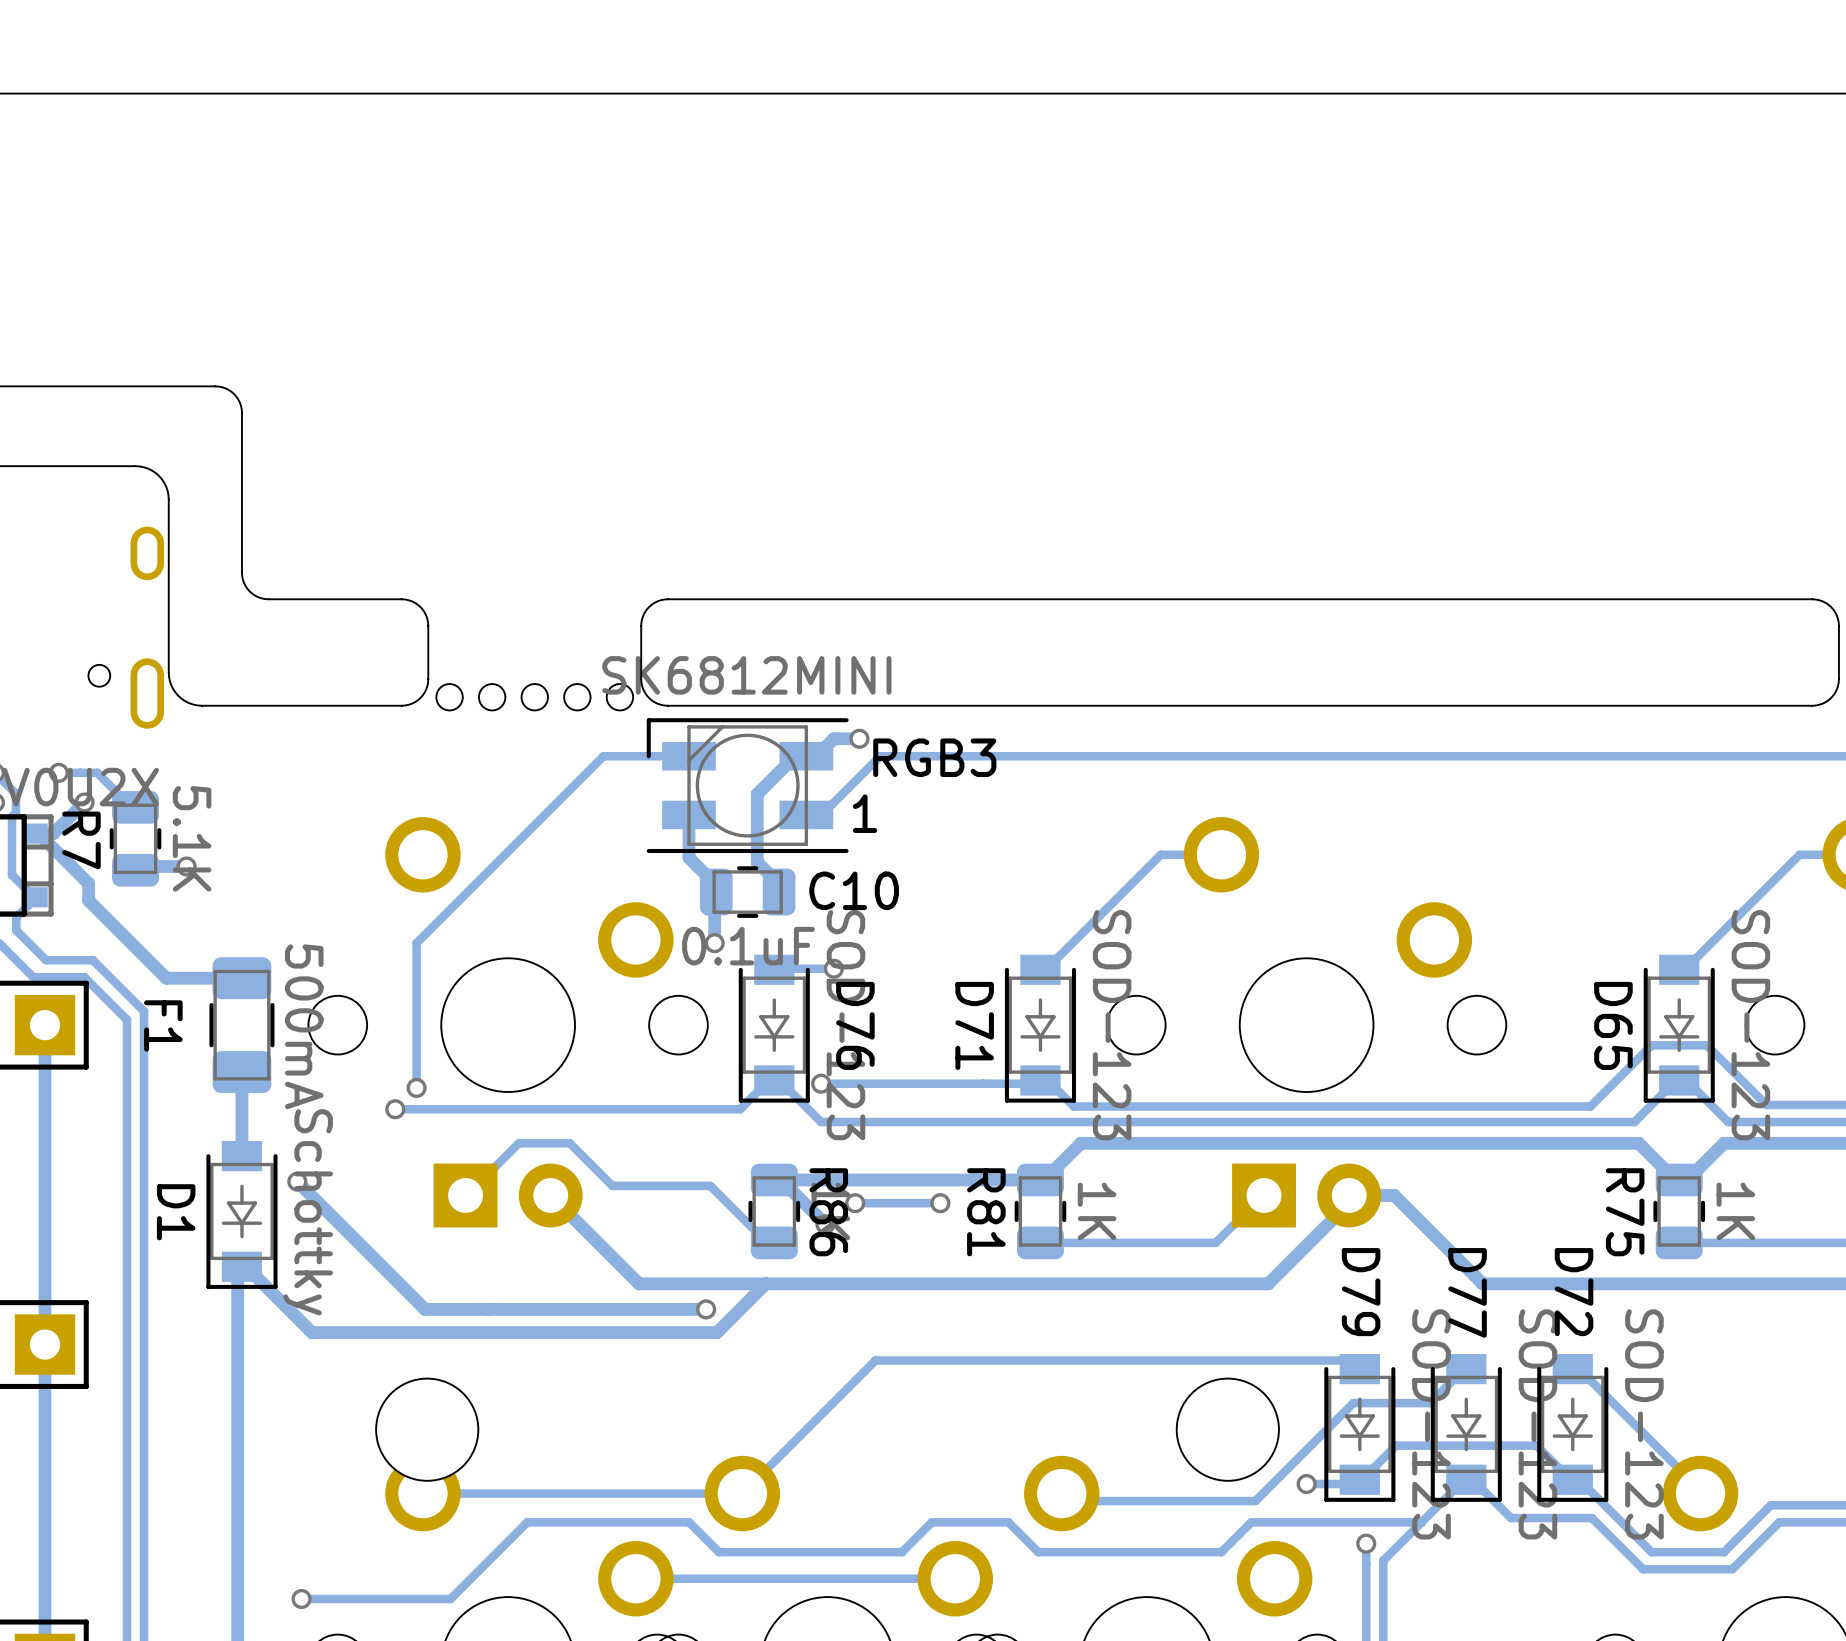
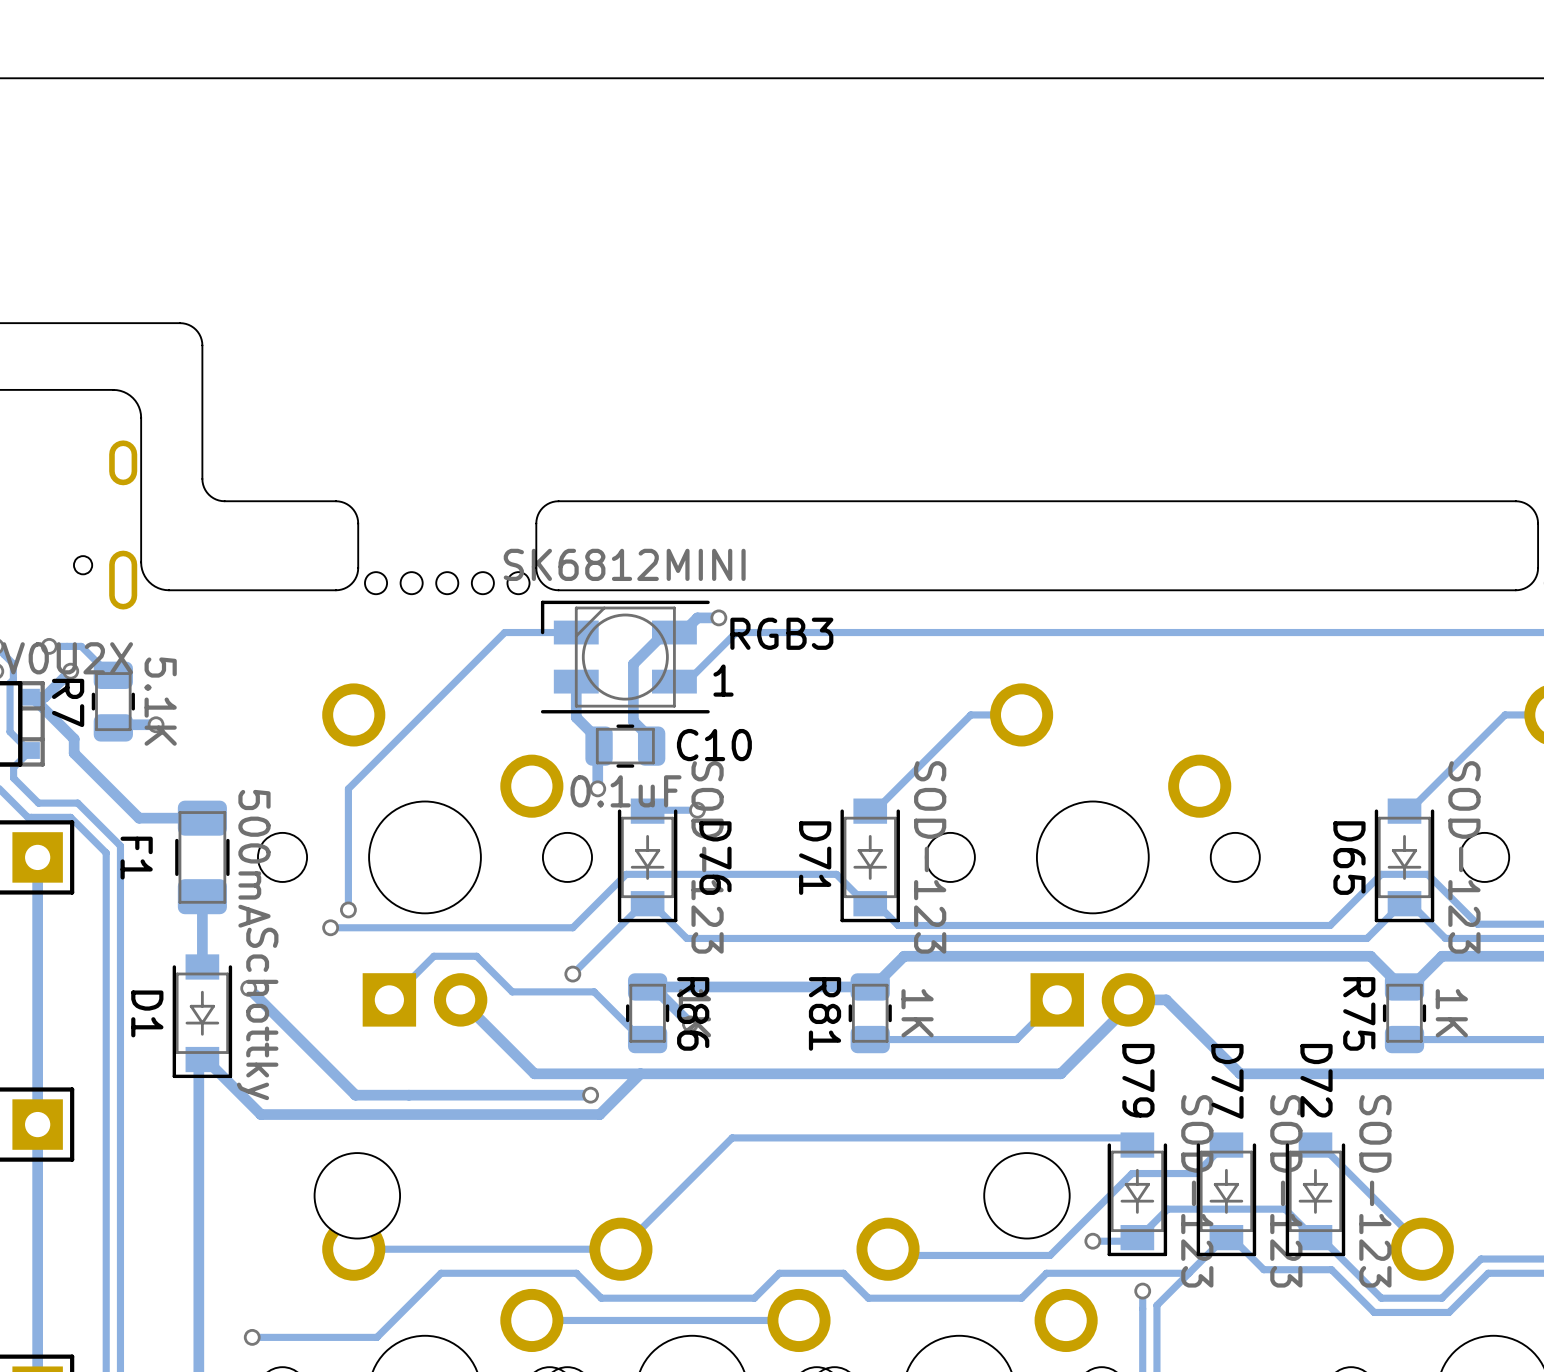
track: (1035, 1080) (1028, 1080) (1025, 1083) (821, 1083) -> (865, 903) (836, 874) (626, 874) (572, 927)
via: (821, 1083) -> none
track: (740, 1109) (684, 1109) -> (619, 927) (572, 974)
via: none -> (572, 974)
via: (855, 1203) -> none
track: (940, 1203) (855, 1203) -> none
via: (940, 1203) -> none

